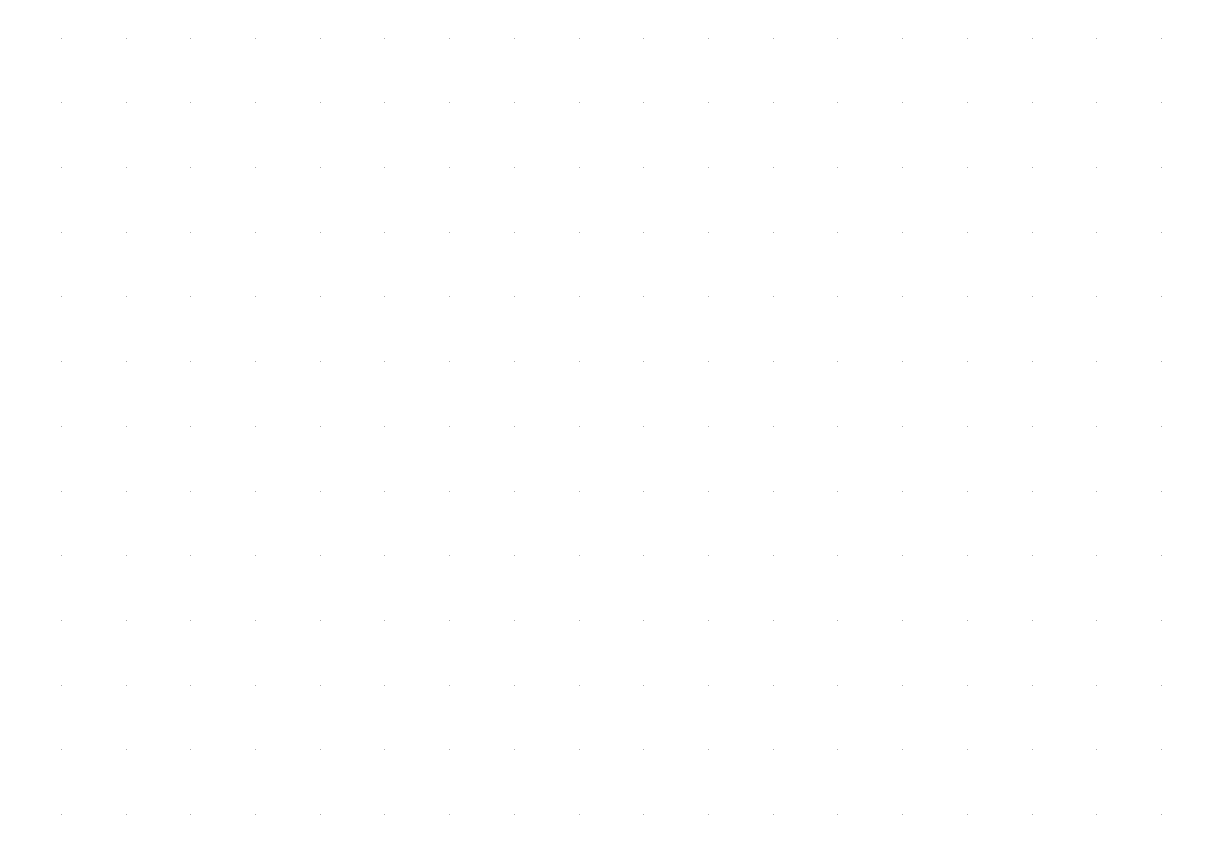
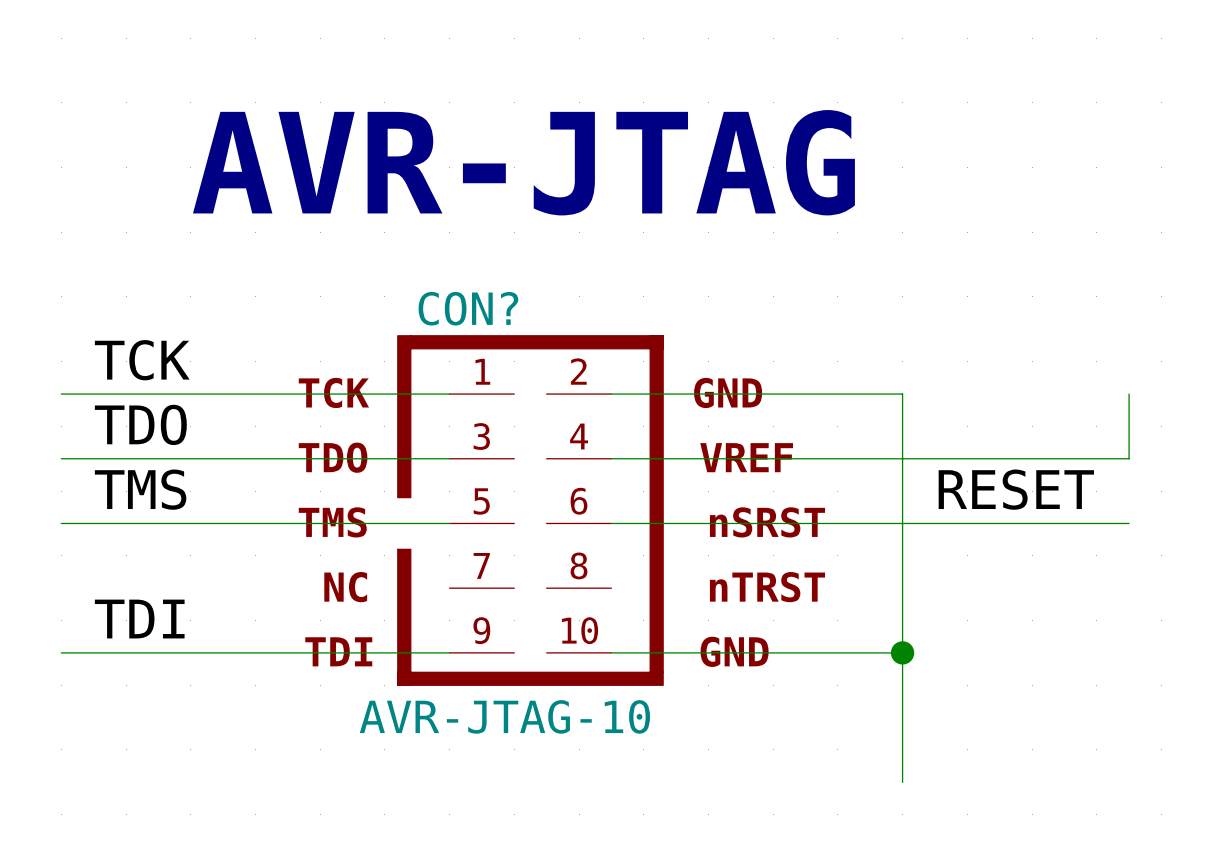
text: none -> AVR-JTAG (523, 162)
label: none -> TCK (142, 360)
wire: none -> (61, 394) (449, 394)
wire: none -> (611, 394) (902, 394) (902, 782)
wire: none -> (1129, 394) (1129, 458) (611, 458)
label: none -> TDO (140, 424)
wire: none -> (61, 458) (449, 458)
label: none -> TMS (140, 489)
label: none -> RESET (1016, 489)
CON?: none -> AVR-JTAG-10 (530, 510)
wire: none -> (61, 523) (449, 523)
wire: none -> (611, 523) (1129, 523)
label: none -> TDI (139, 619)
wire: none -> (61, 652) (449, 652)
wire: none -> (611, 652) (902, 652)
junction: none -> (902, 652)

